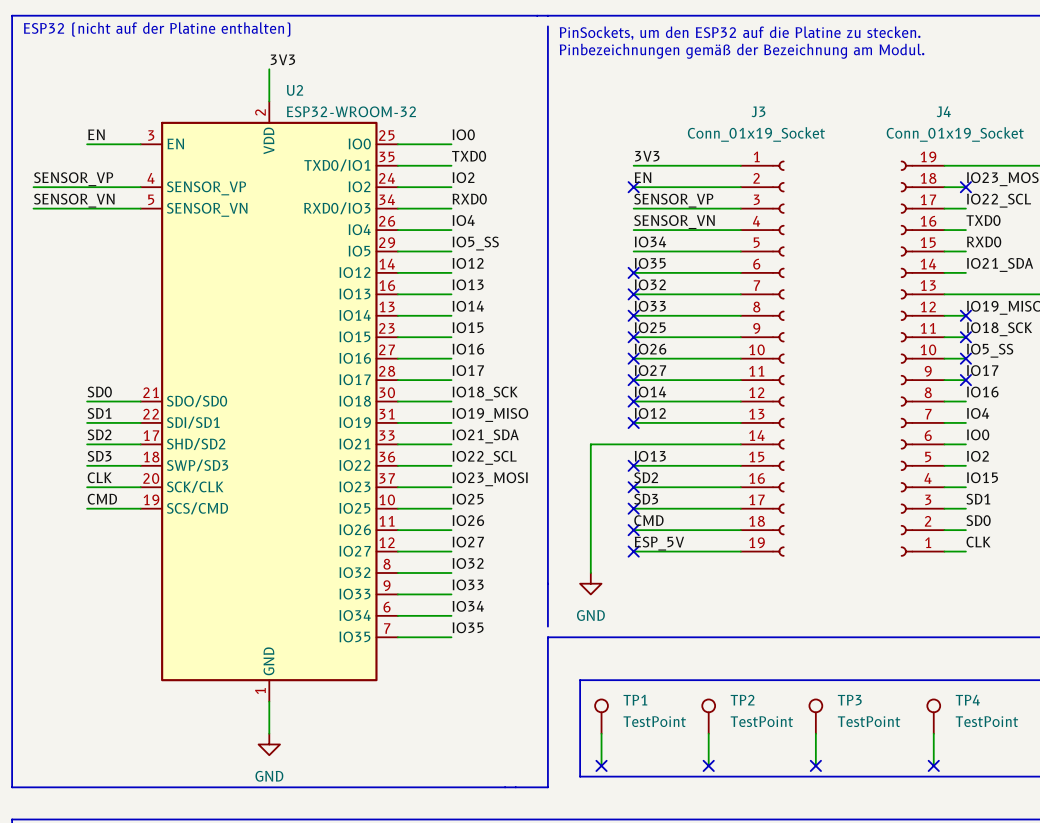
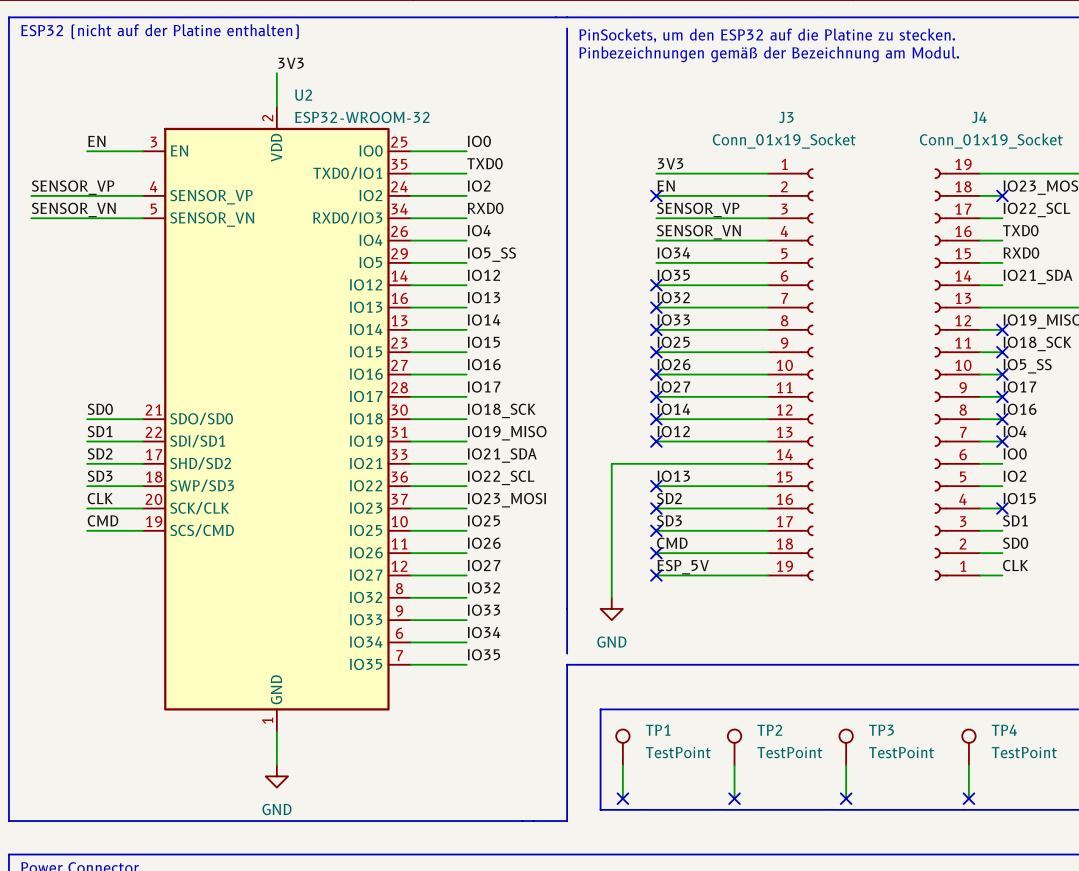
no-connect mark: none -> (1002, 419)
no-connect mark: none -> (1002, 441)
no-connect mark: none -> (1002, 508)

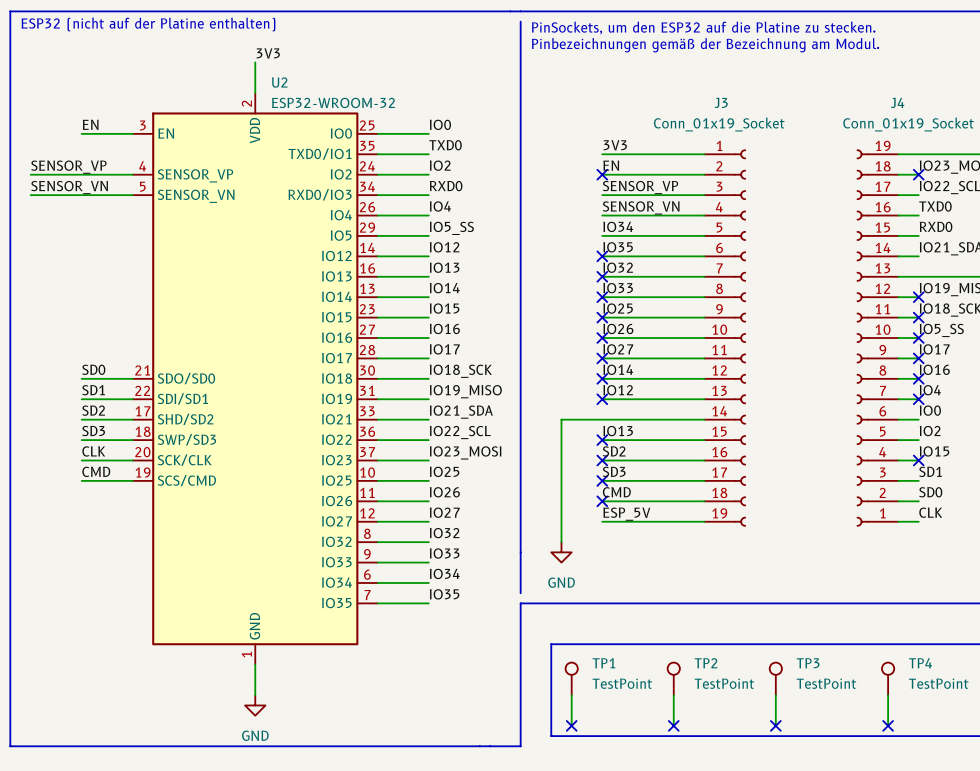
no-connect mark: (656, 575) -> none

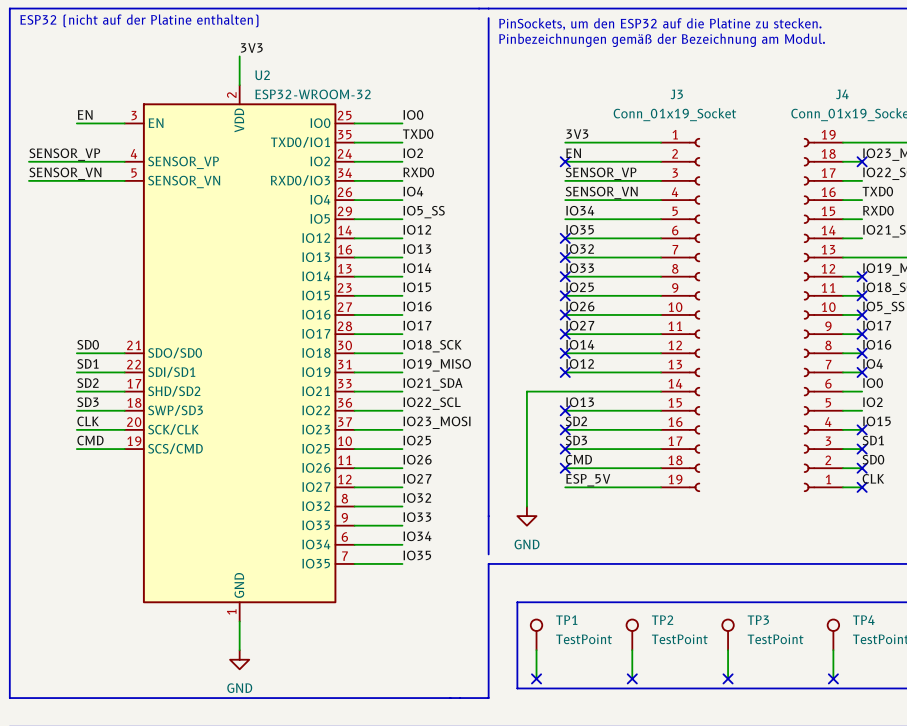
no-connect mark: none -> (862, 449)
no-connect mark: none -> (862, 468)
no-connect mark: none -> (862, 487)

